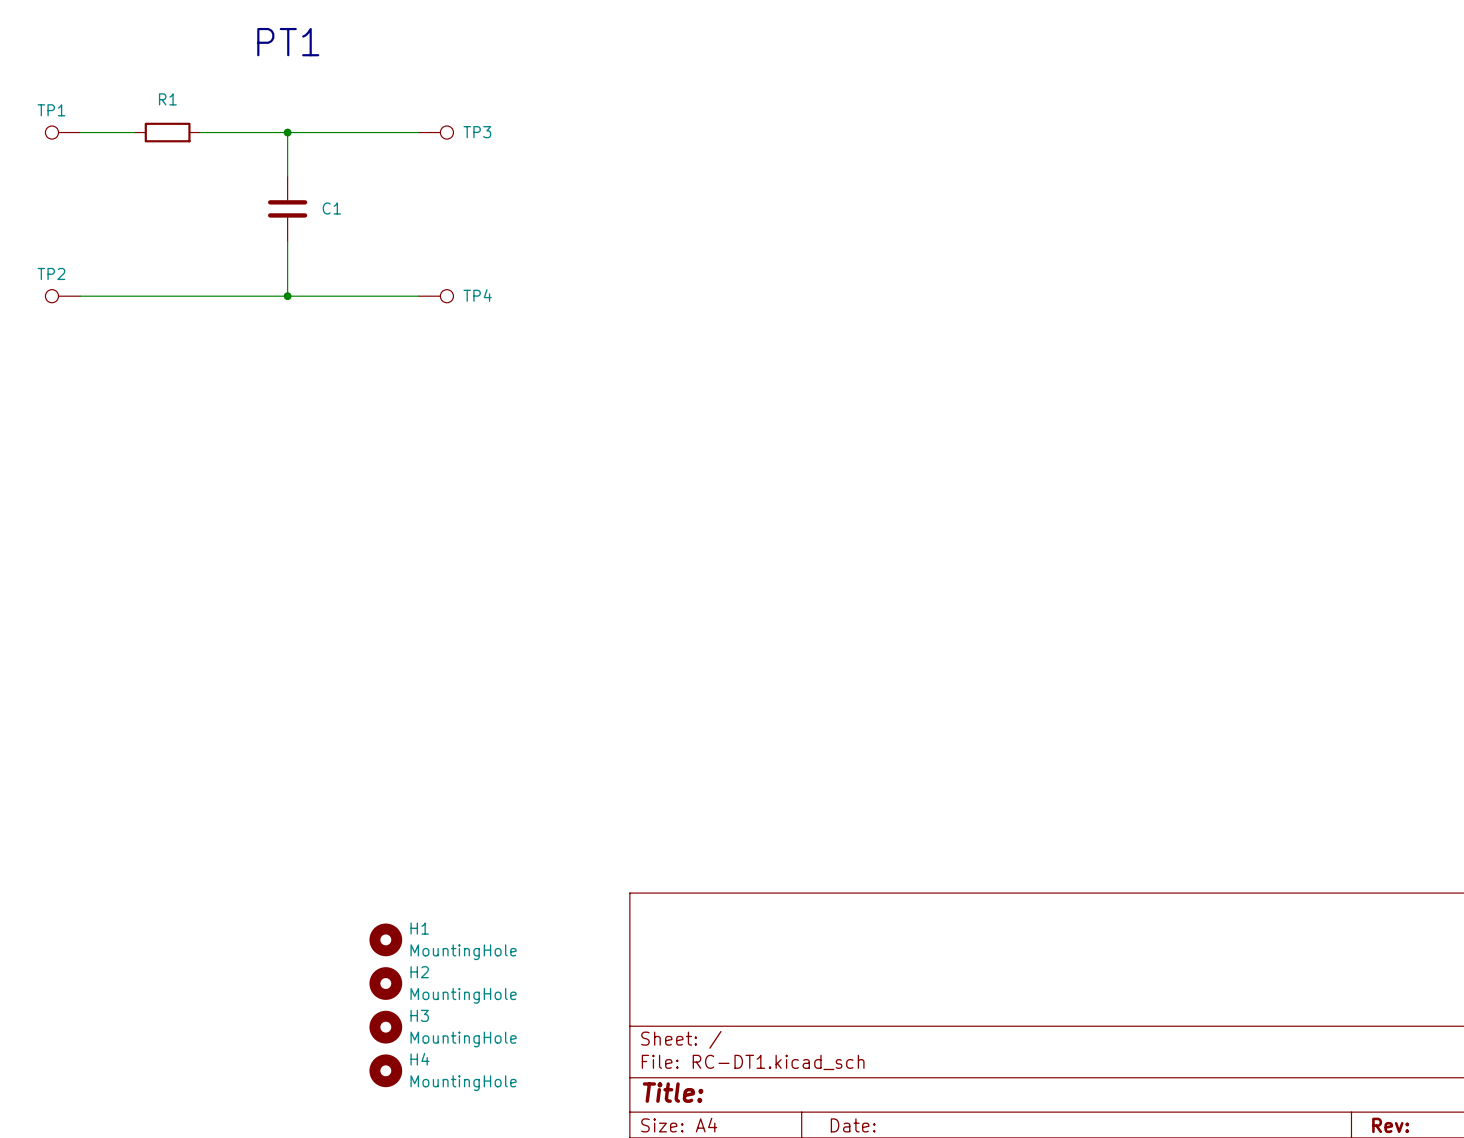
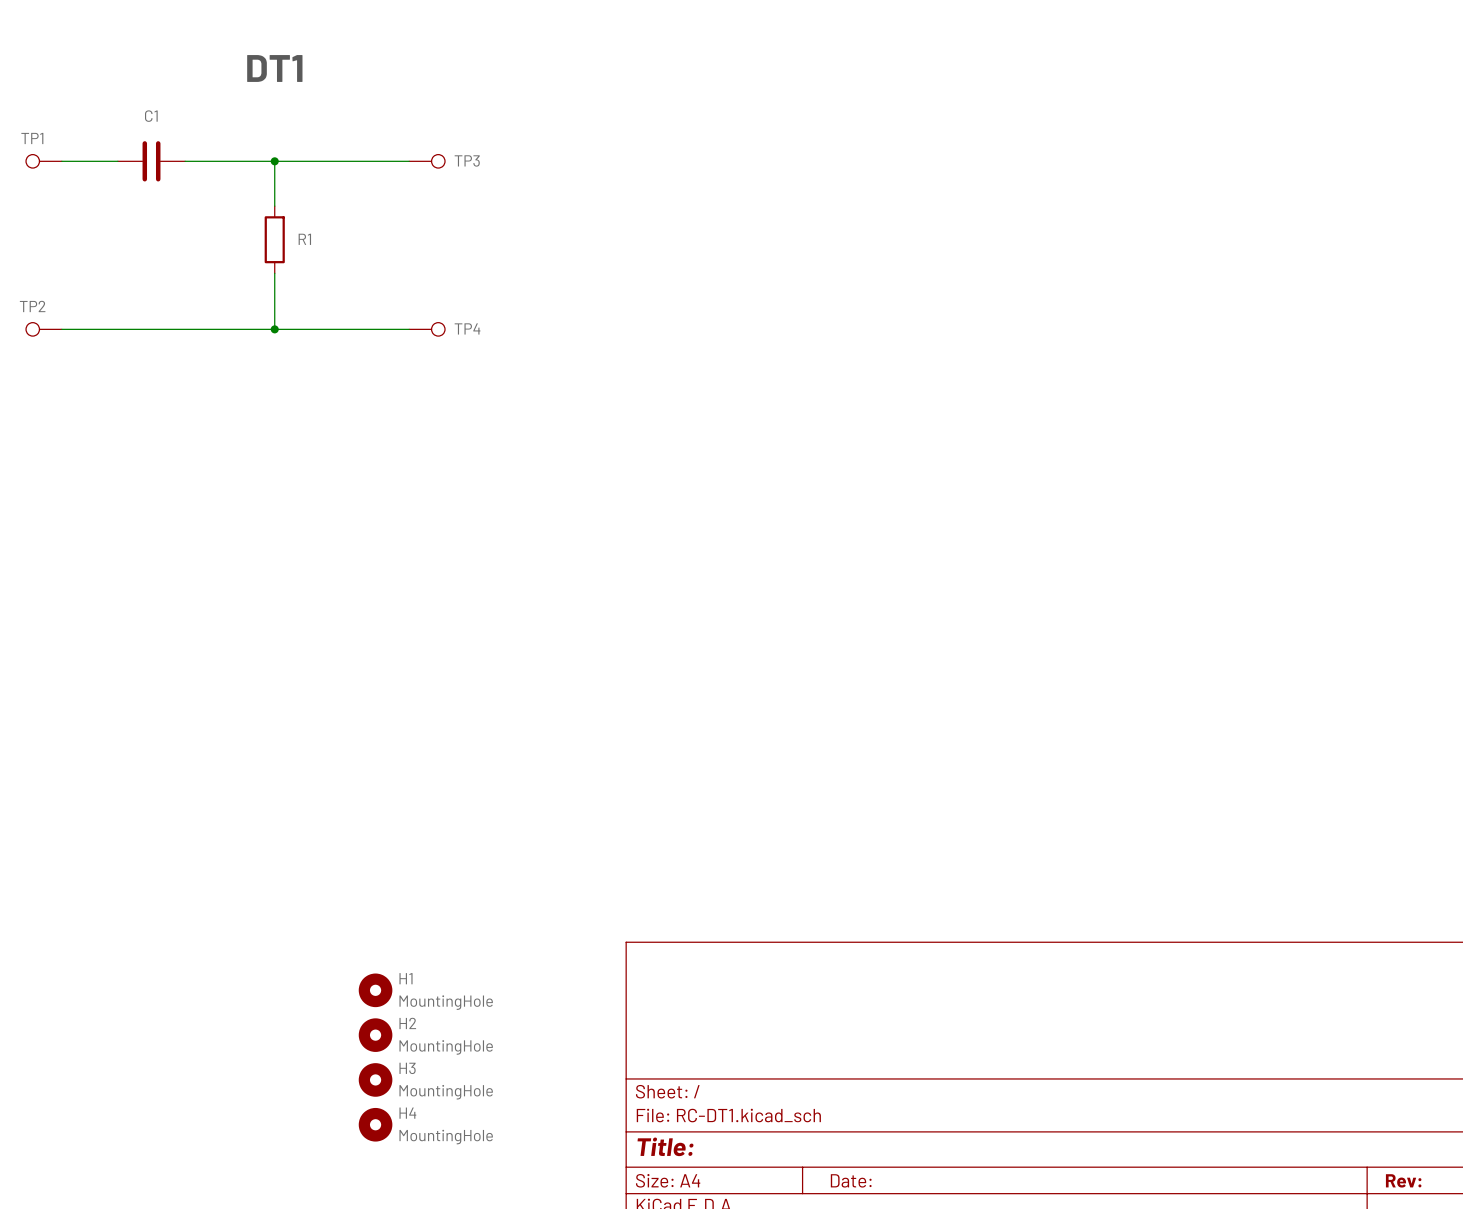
text: PT1 (288, 42) -> DT1 (274, 68)
R1 rotation: 0° (167, 132) -> 90° clockwise (274, 239)
R1 position: (167, 132) -> (274, 239)
C1 rotation: 0° (287, 208) -> 90° clockwise (151, 161)
C1 position: (287, 208) -> (151, 161)
C1 name position: C1 (331, 208) -> C1 (151, 116)

